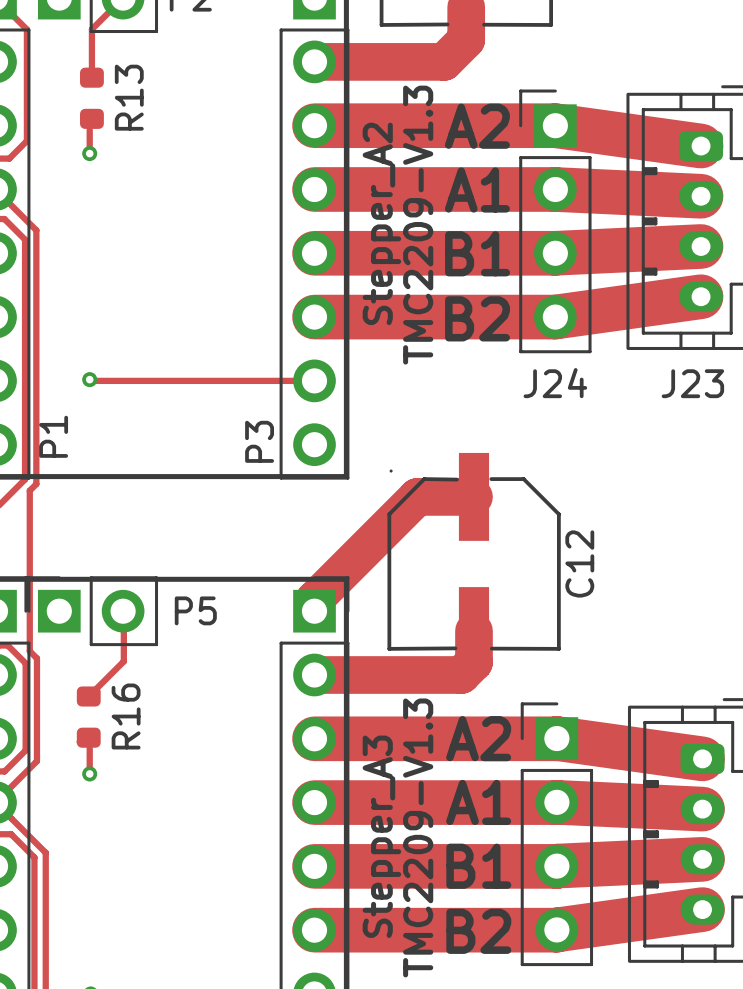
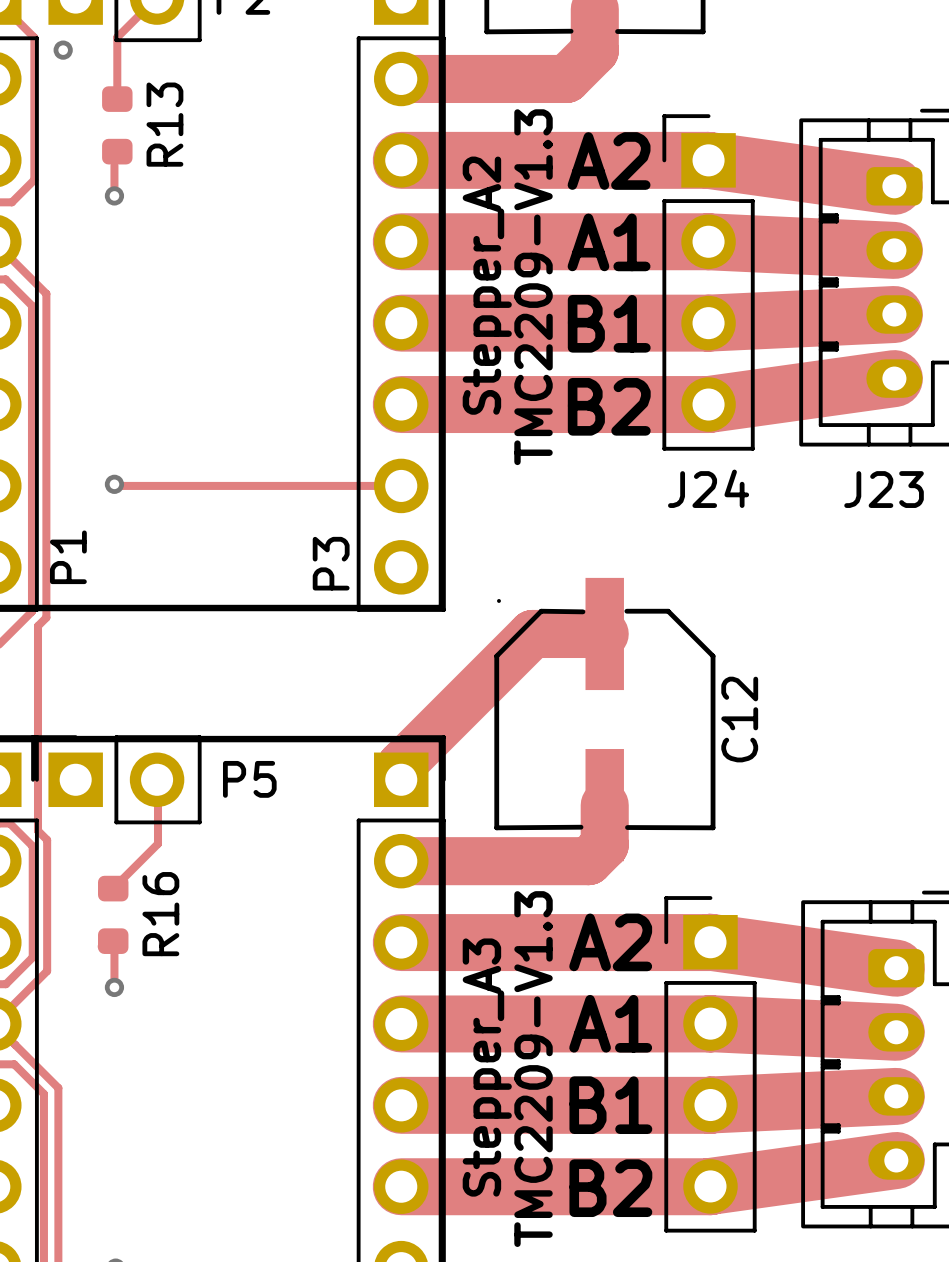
via: none -> (63, 50)

